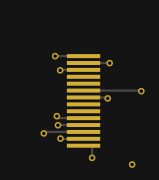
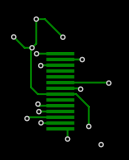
via: none -> (36, 19)
track: none -> (13, 36) (24, 47) (32, 47)
via: none -> (13, 36)
track: none -> (62, 37) (44, 19) (36, 19) (36, 43) (30, 48) (30, 87) (37, 94) (76, 94) (88, 106) (88, 126)
via: none -> (62, 37)
via: none -> (32, 47)
via: none -> (88, 126)

